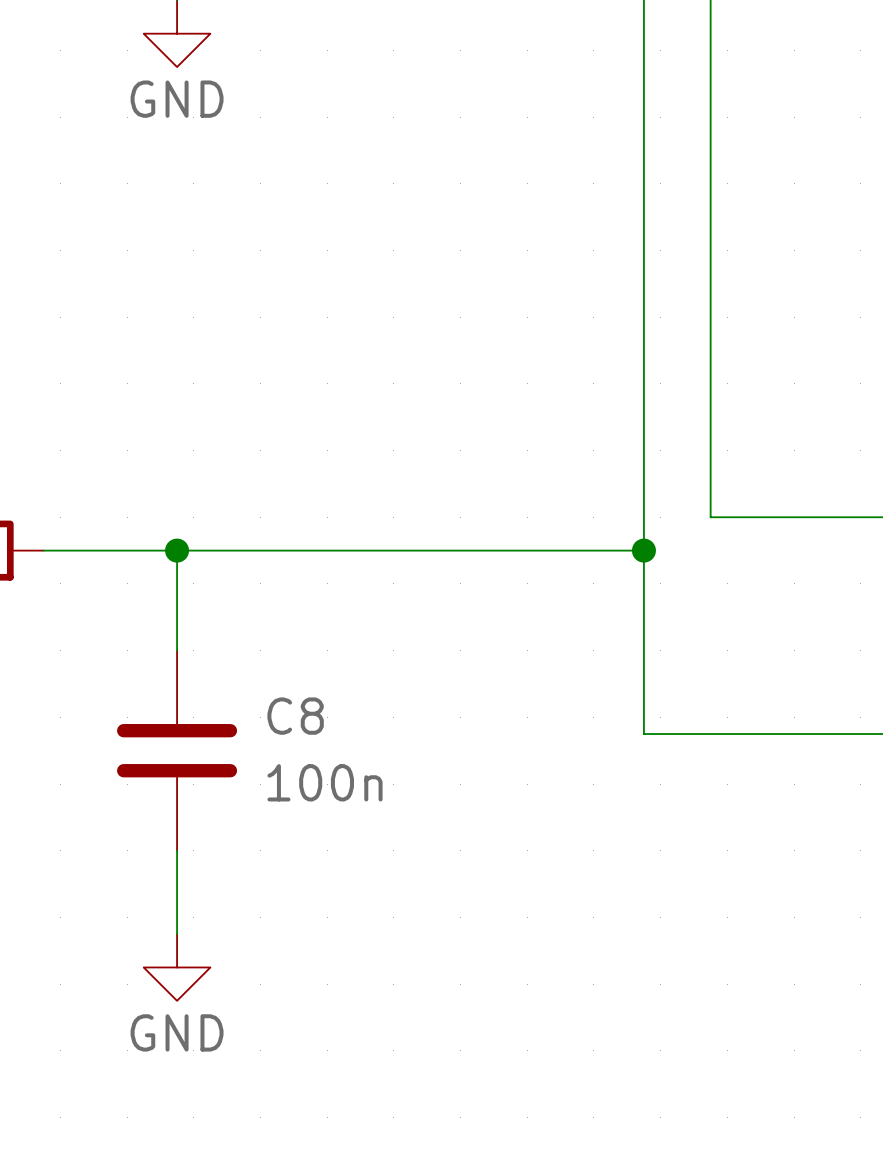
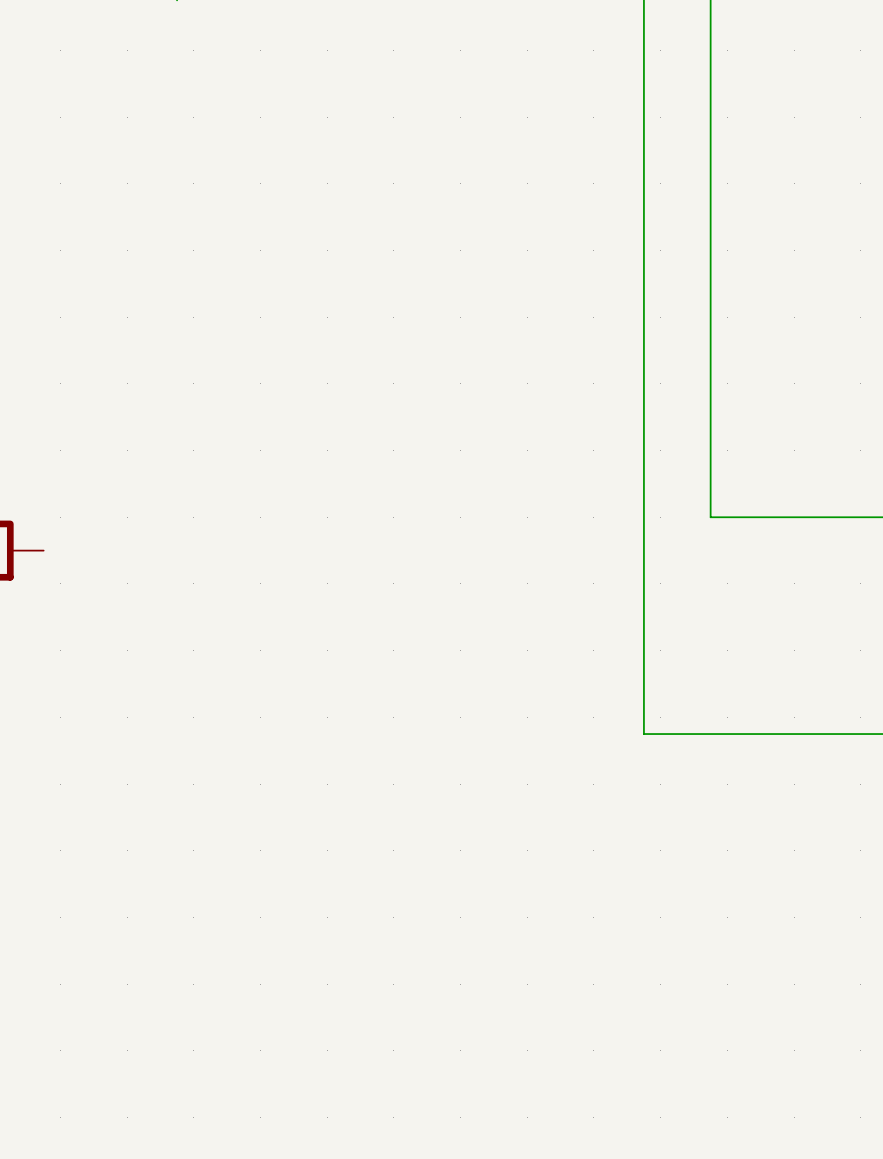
power symbol: GND (177, 33) -> none
wire: (43, 550) (643, 550) -> none
wire: (177, 550) (177, 650) -> none
junction: (177, 550) -> none
junction: (643, 550) -> none
C8: 100n (177, 750) -> none
wire: (177, 850) (177, 934) -> none
power symbol: GND (177, 967) -> none

